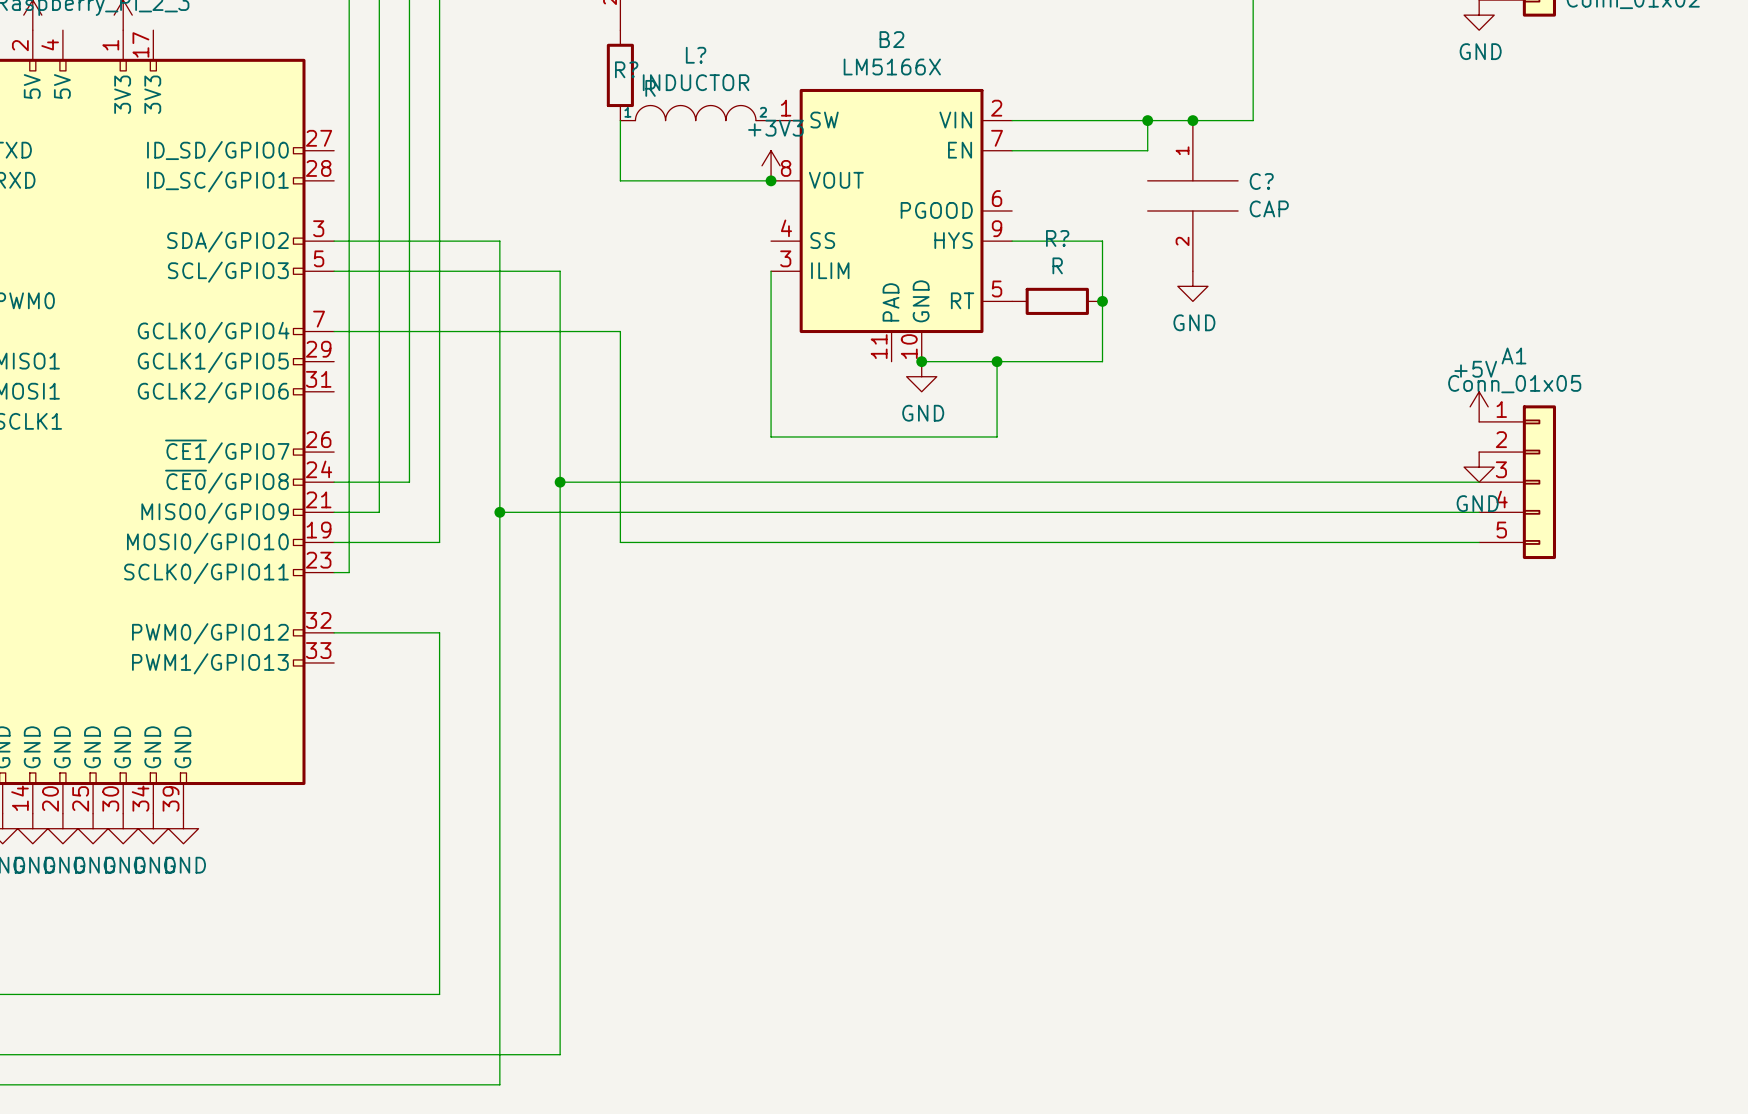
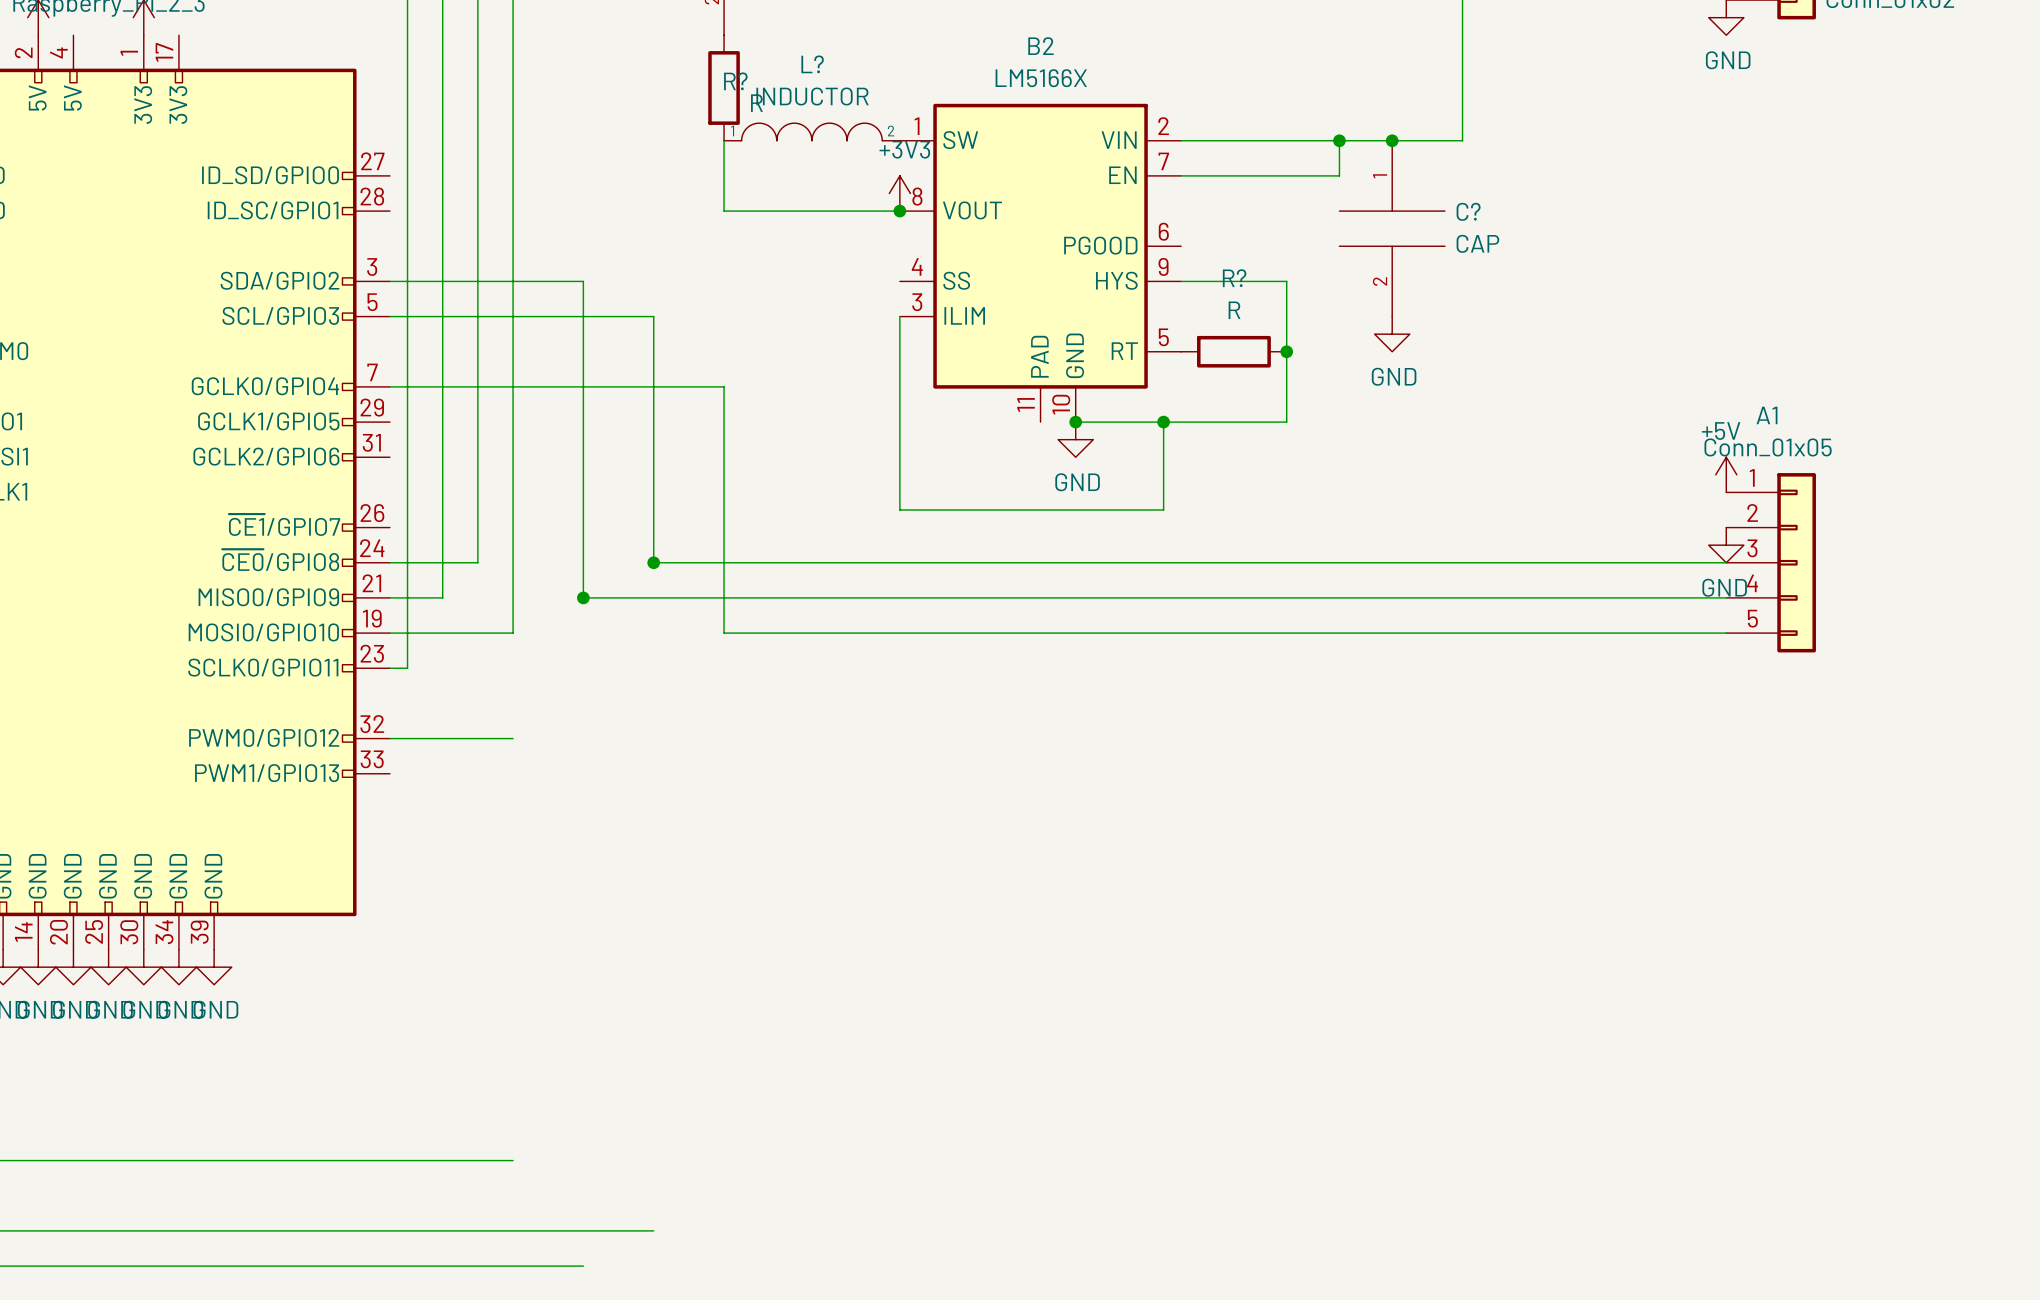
wire: (560, 482) (560, 1054) -> none
wire: (499, 512) (499, 1084) -> none
wire: (439, 632) (439, 994) -> none

